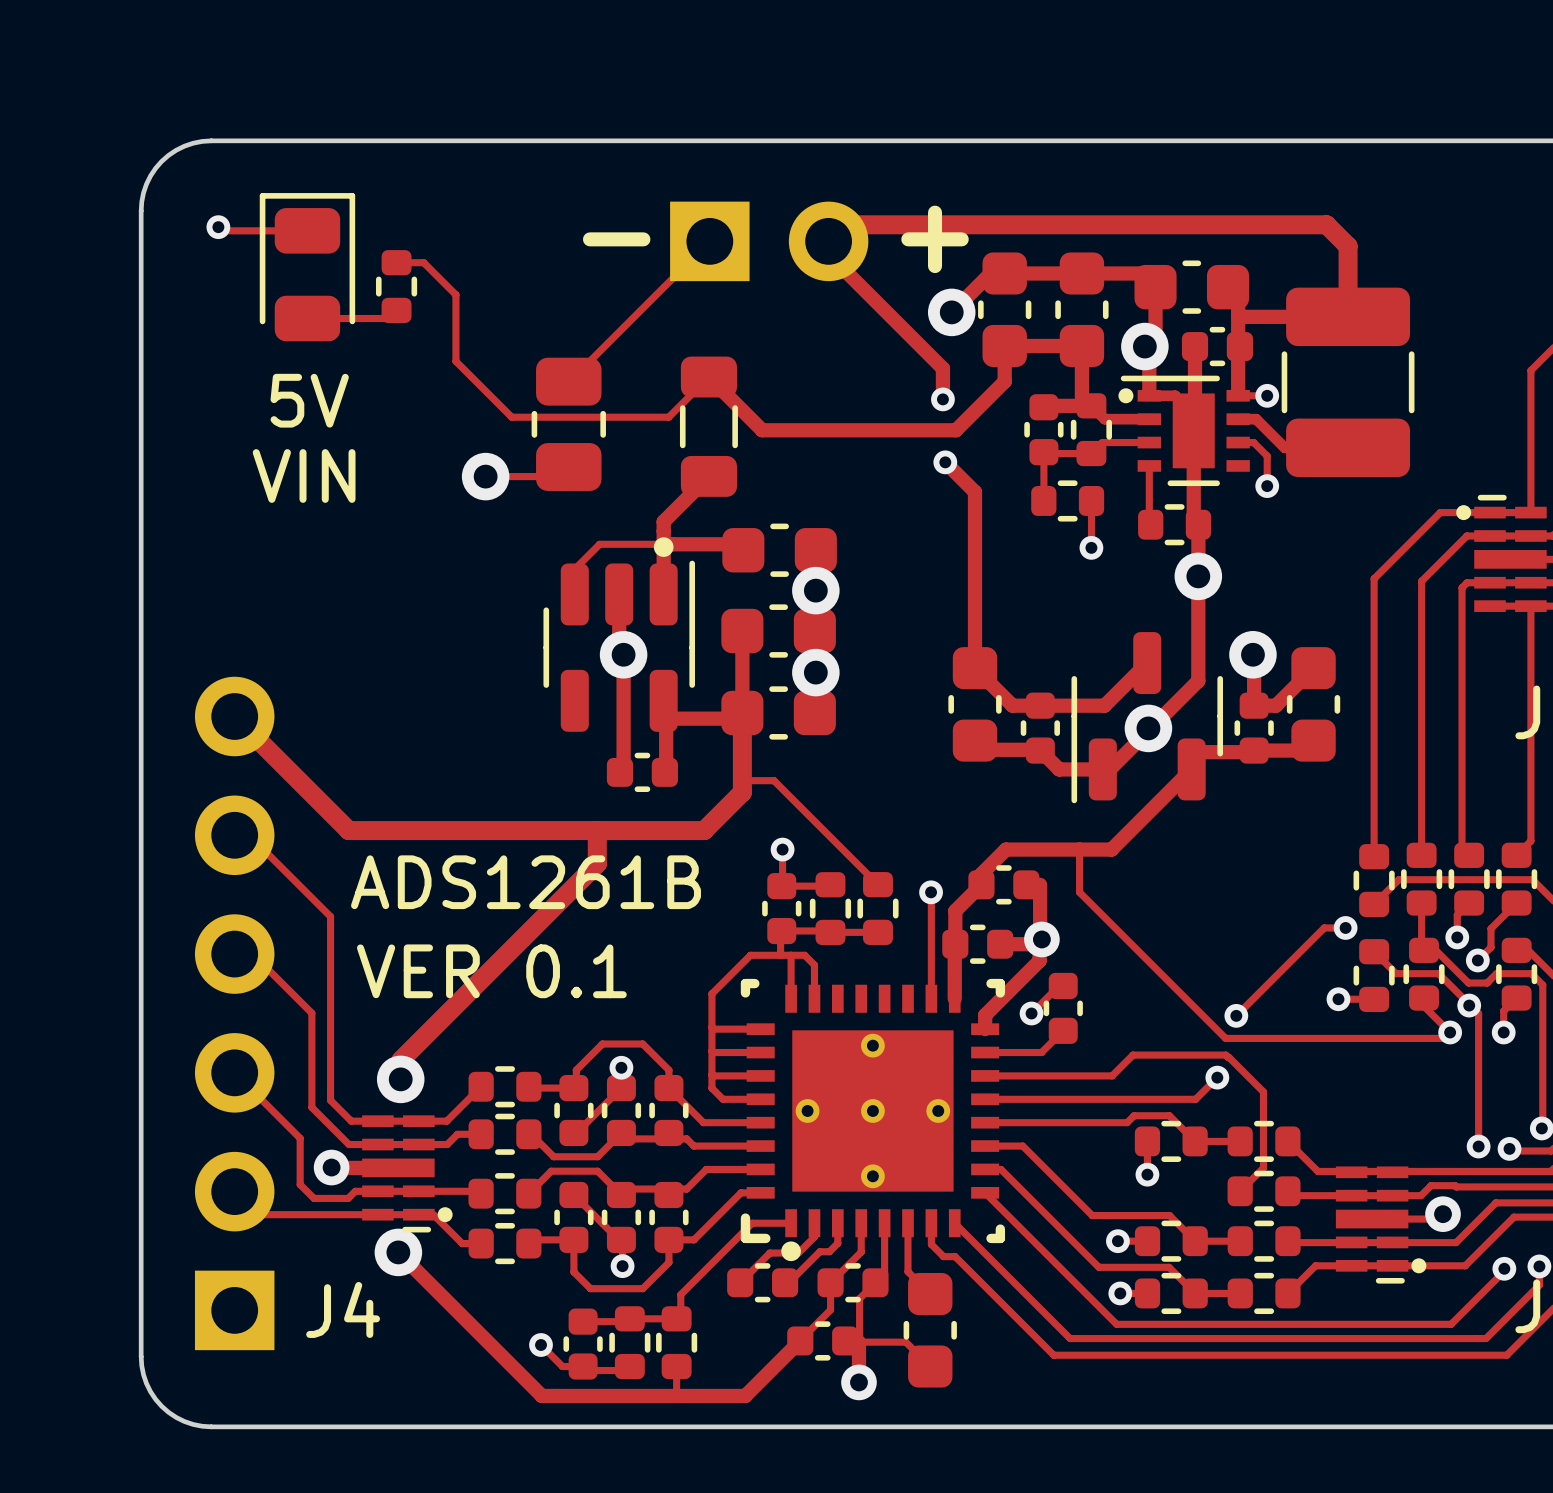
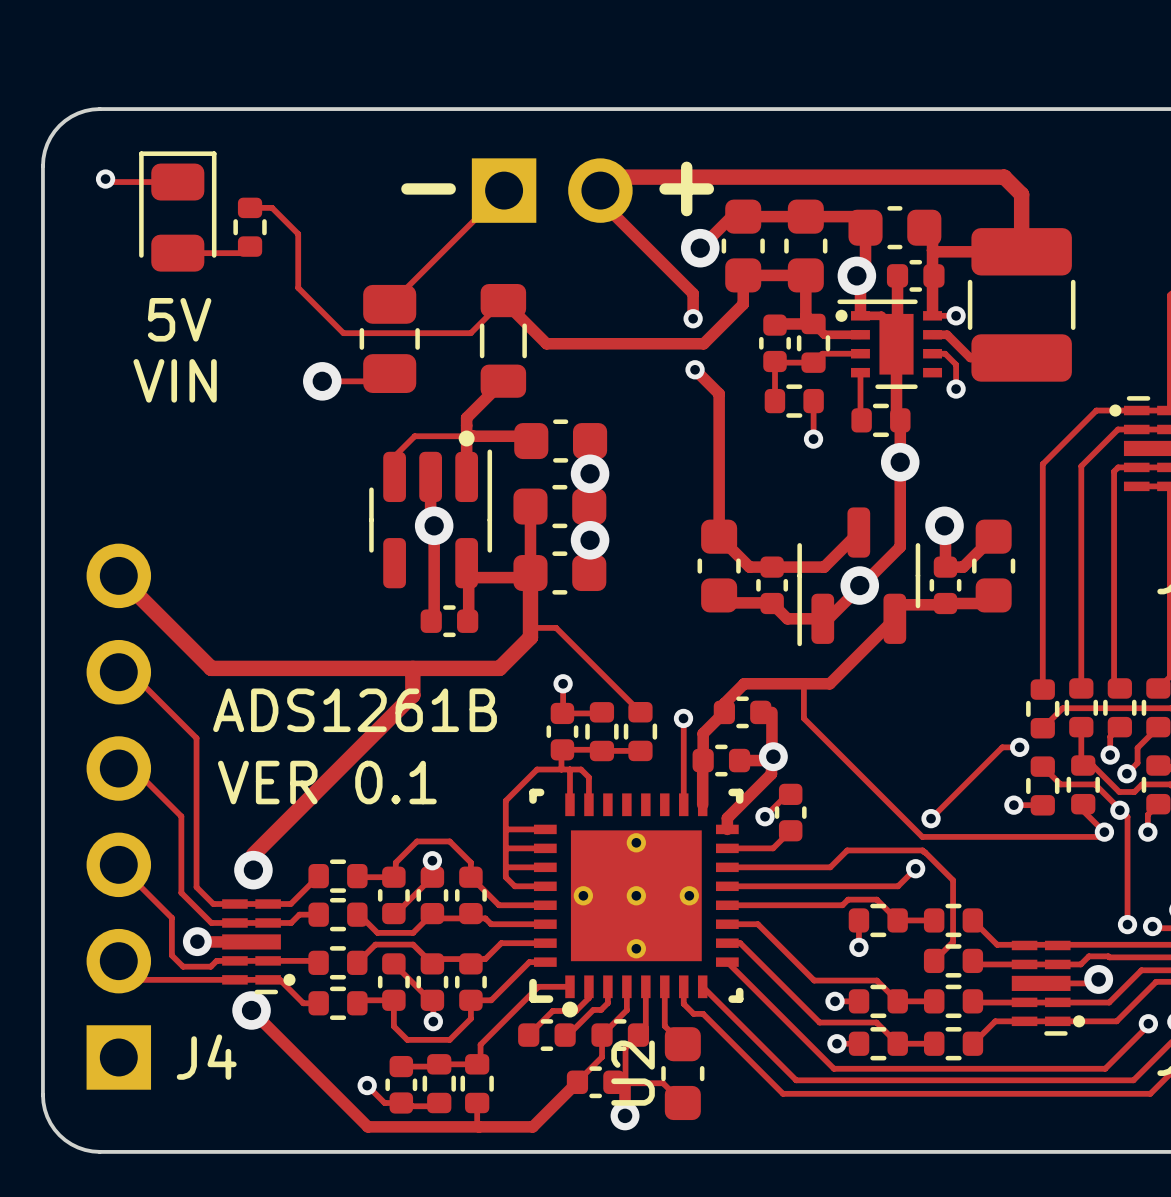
U2 name: none -> U2 (633, 1073)

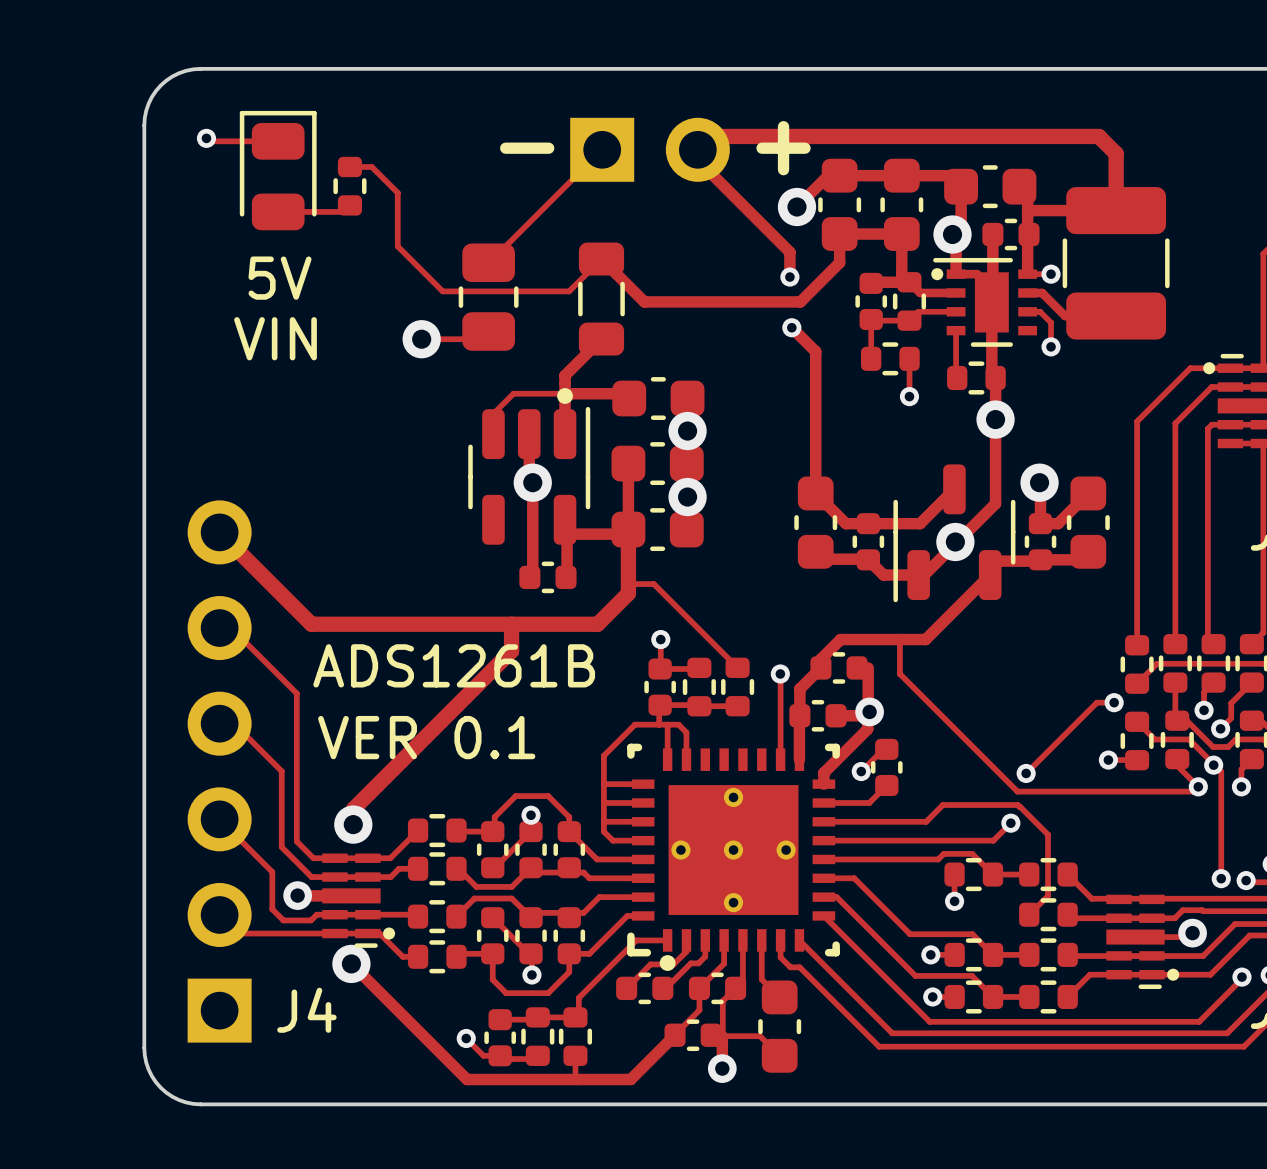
U2 name: U2 (633, 1073) -> none

